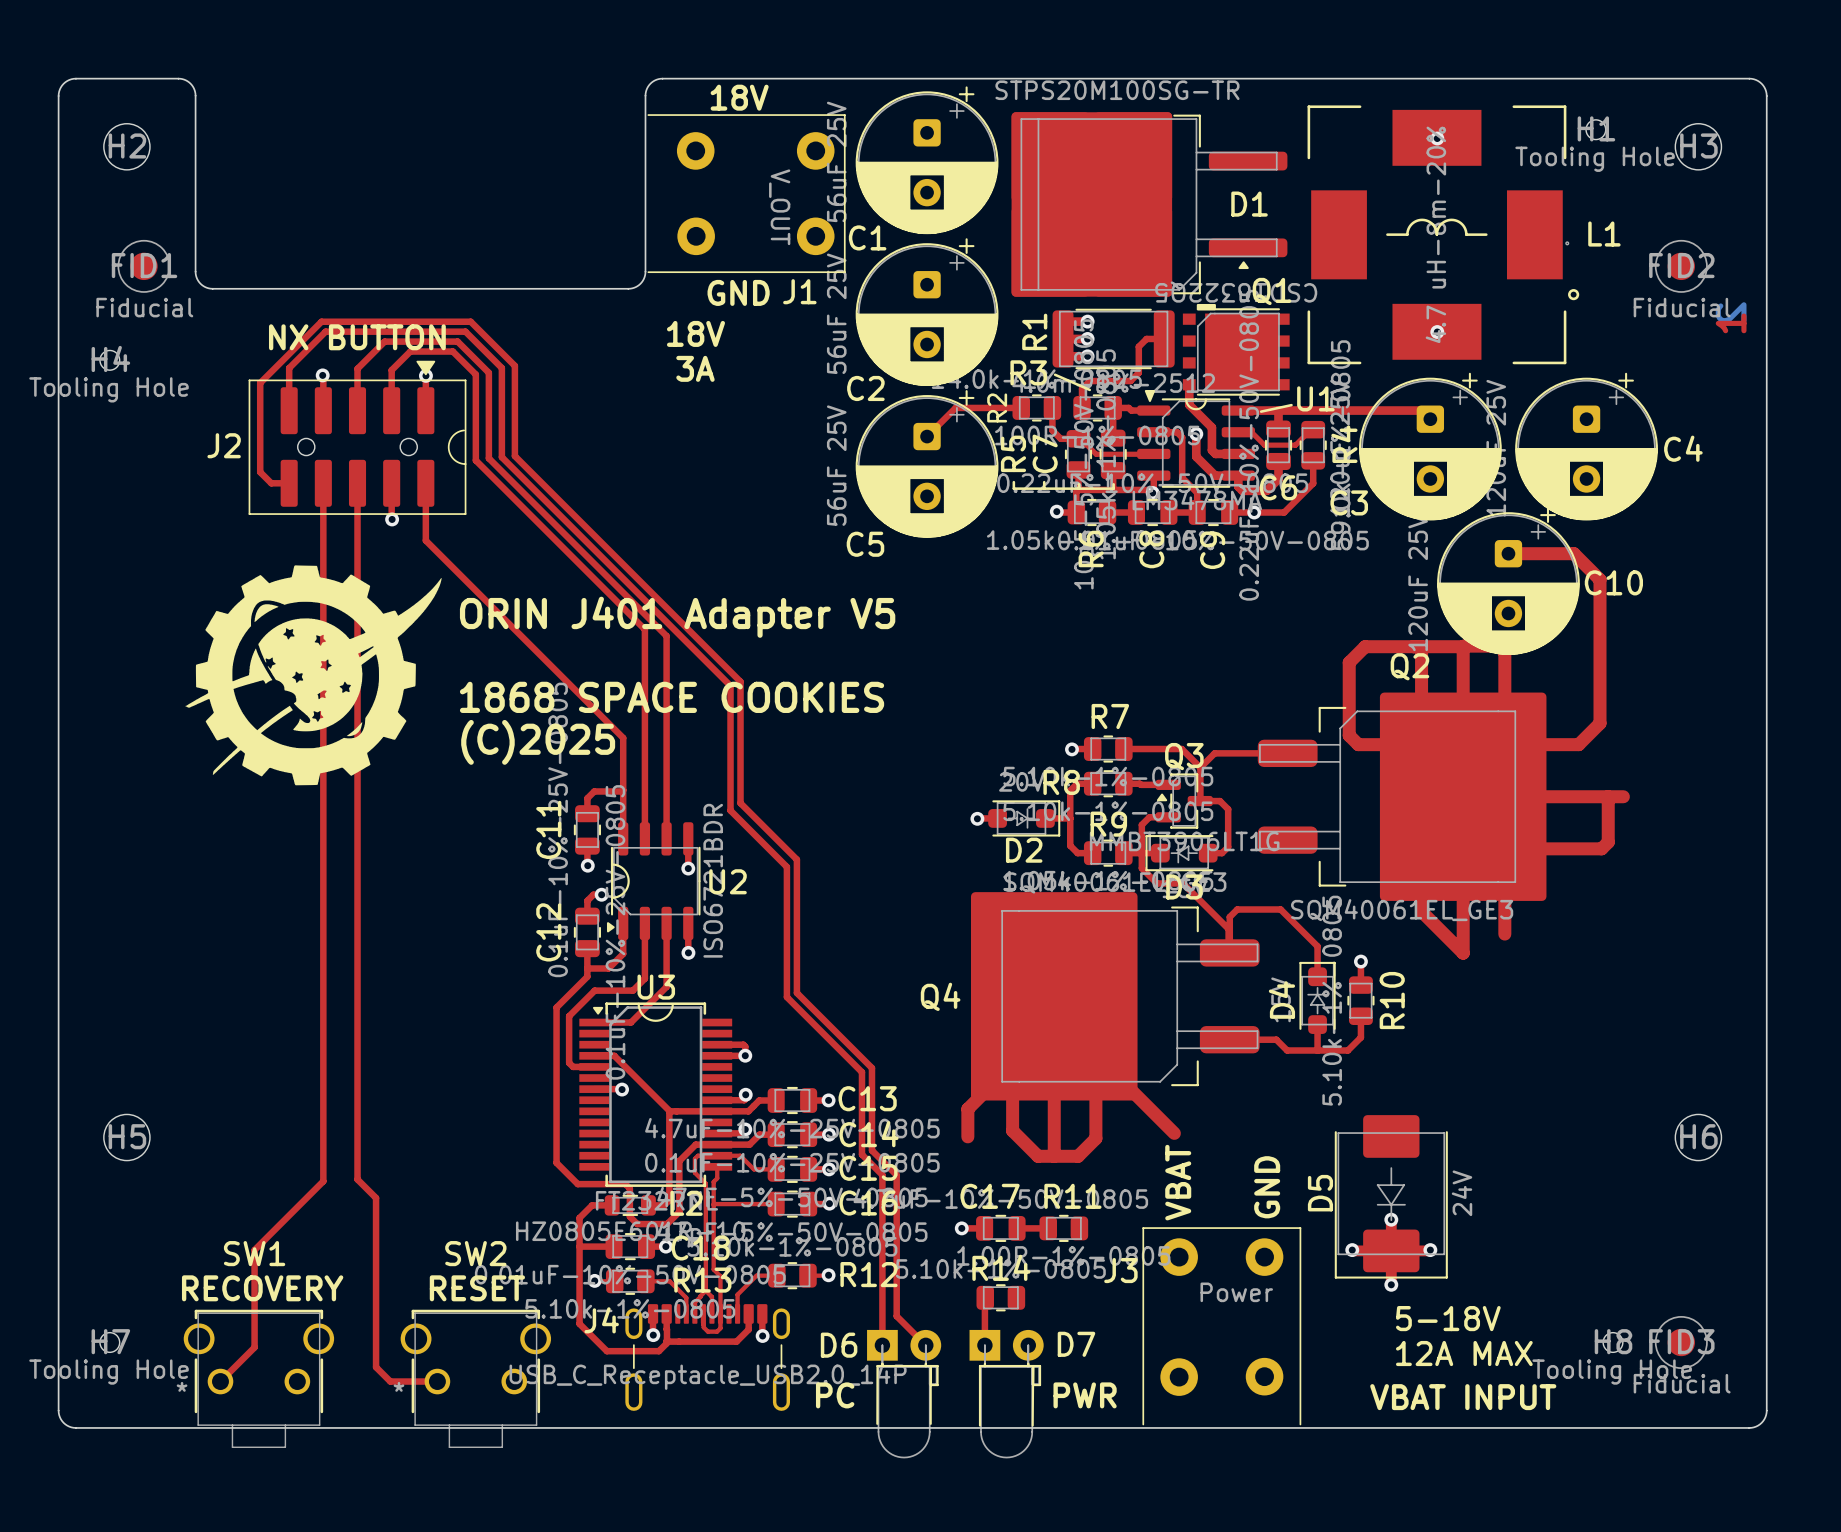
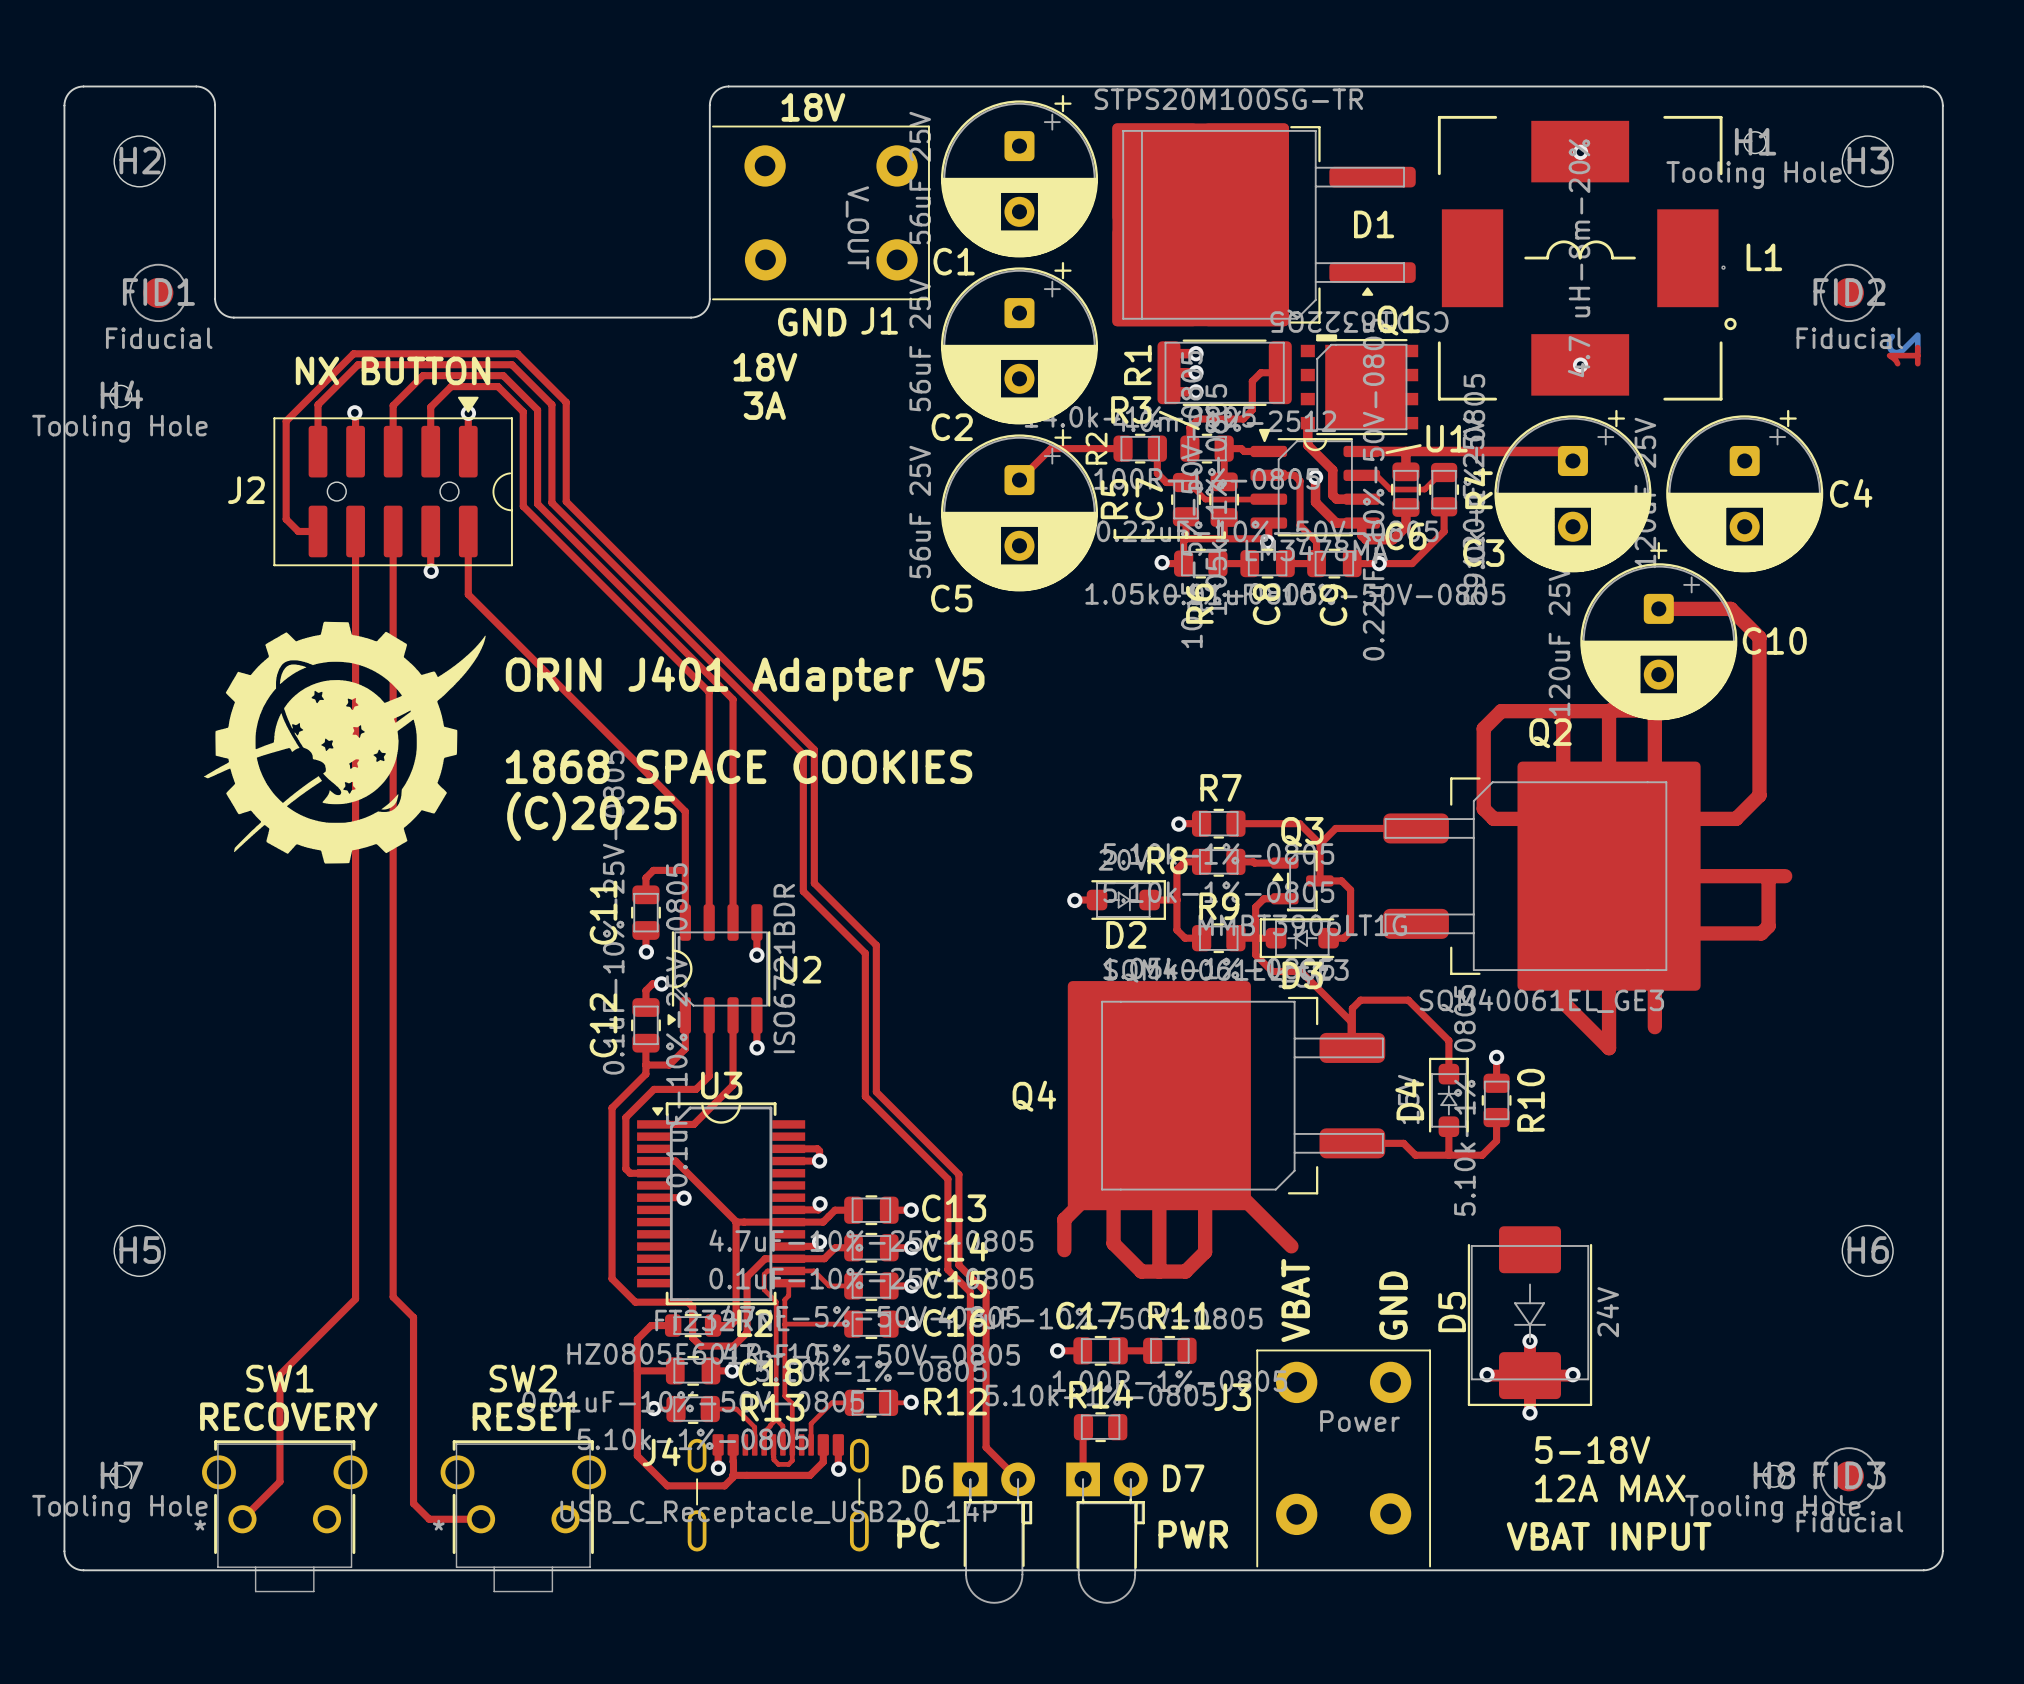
C10 footprint: [1437, 507, 1580, 655] -> [1580, 542, 1738, 721]

